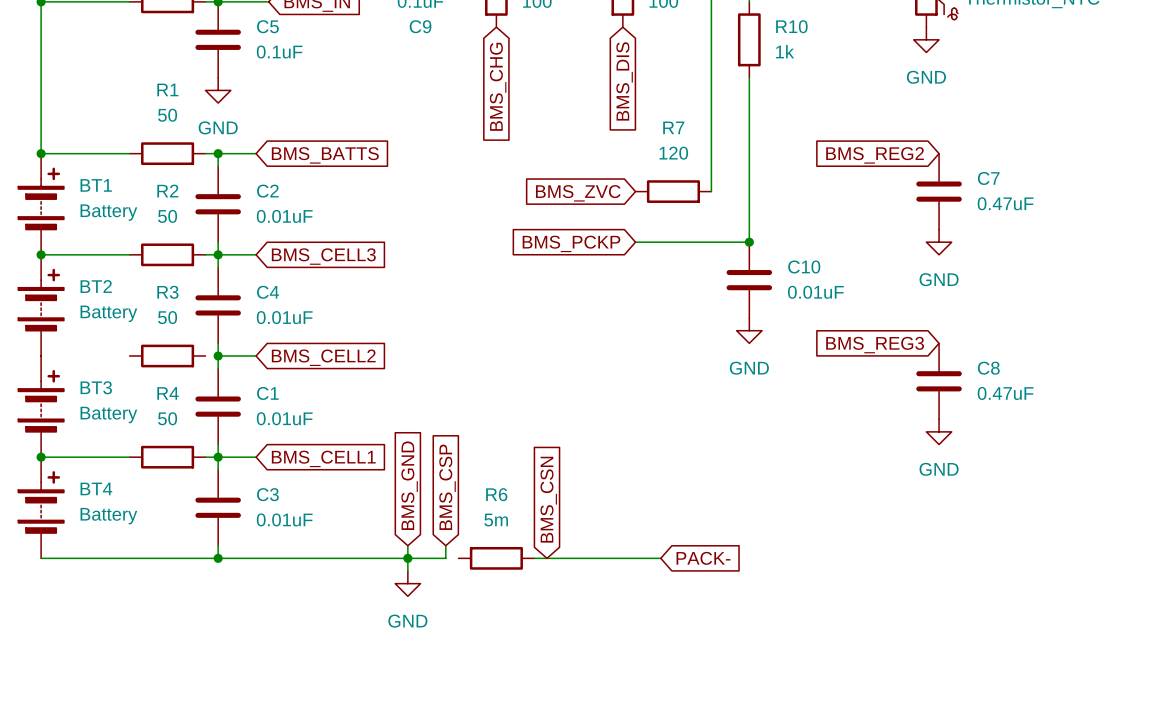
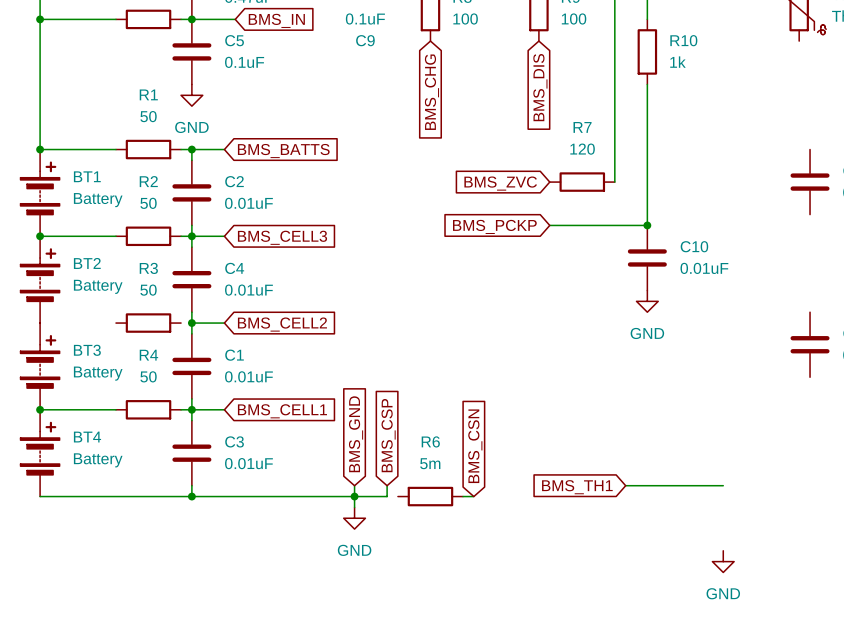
power symbol: GND (926, 39) -> none
global label: BMS_REG2 (875, 155) -> none
power symbol: GND (939, 242) -> none
global label: BMS_REG3 (875, 345) -> none
power symbol: GND (939, 431) -> none
global label: none -> BMS_TH1 (577, 487)
wire: (546, 558) (660, 558) -> (625, 485) (723, 485)
global label: PACK- (703, 558) -> none
power symbol: none -> GND (723, 561)

